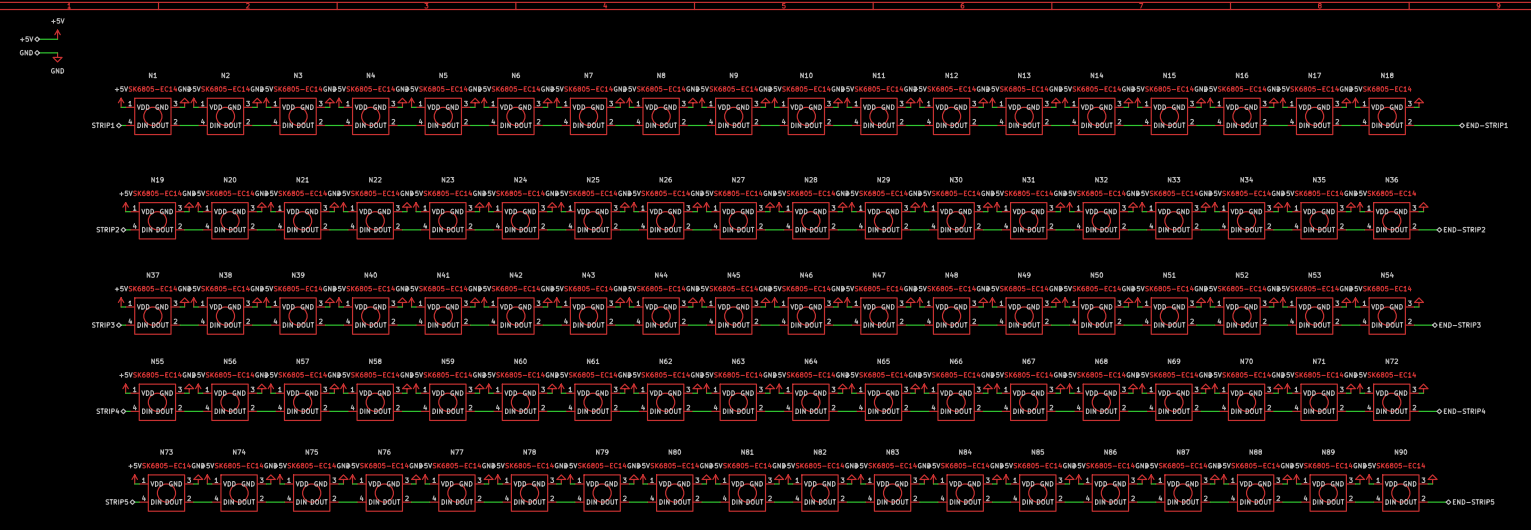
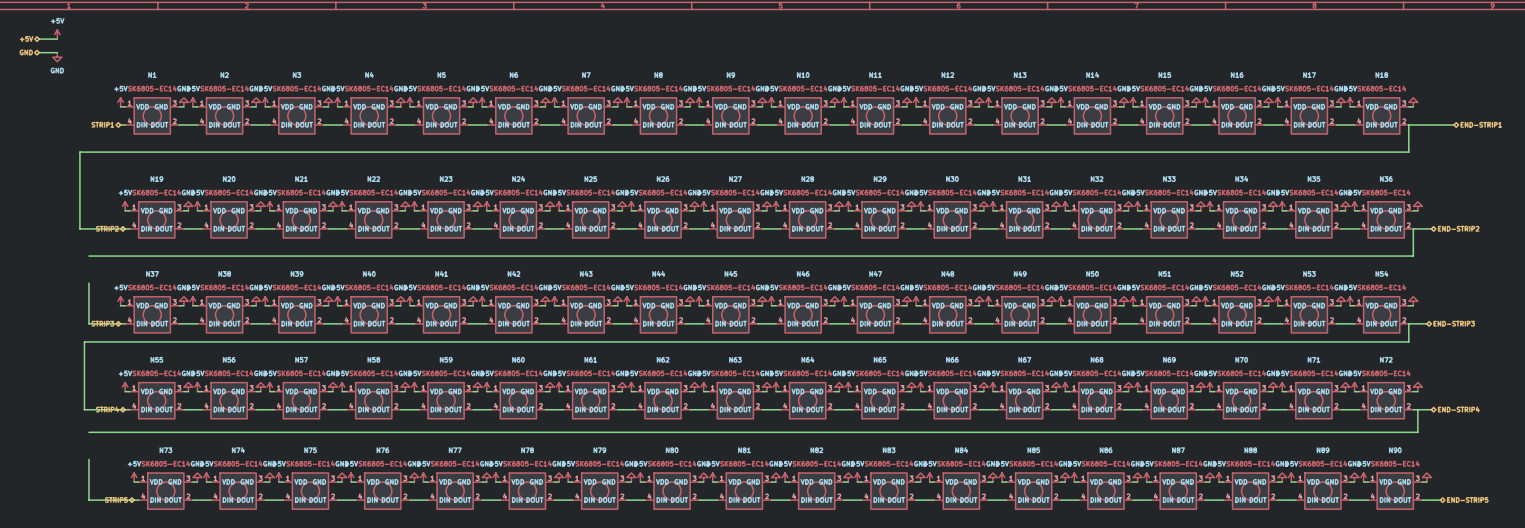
wire: none -> (1408, 124) (1408, 152) (79, 152) (79, 228) (125, 228)
wire: none -> (1413, 228) (1413, 256) (88, 256)
wire: none -> (88, 283) (88, 323) (120, 323)
wire: none -> (1408, 323) (1408, 341) (84, 341) (84, 409) (125, 409)
wire: none -> (1417, 409) (1417, 432) (88, 432)
wire: none -> (88, 459) (88, 500) (134, 500)

